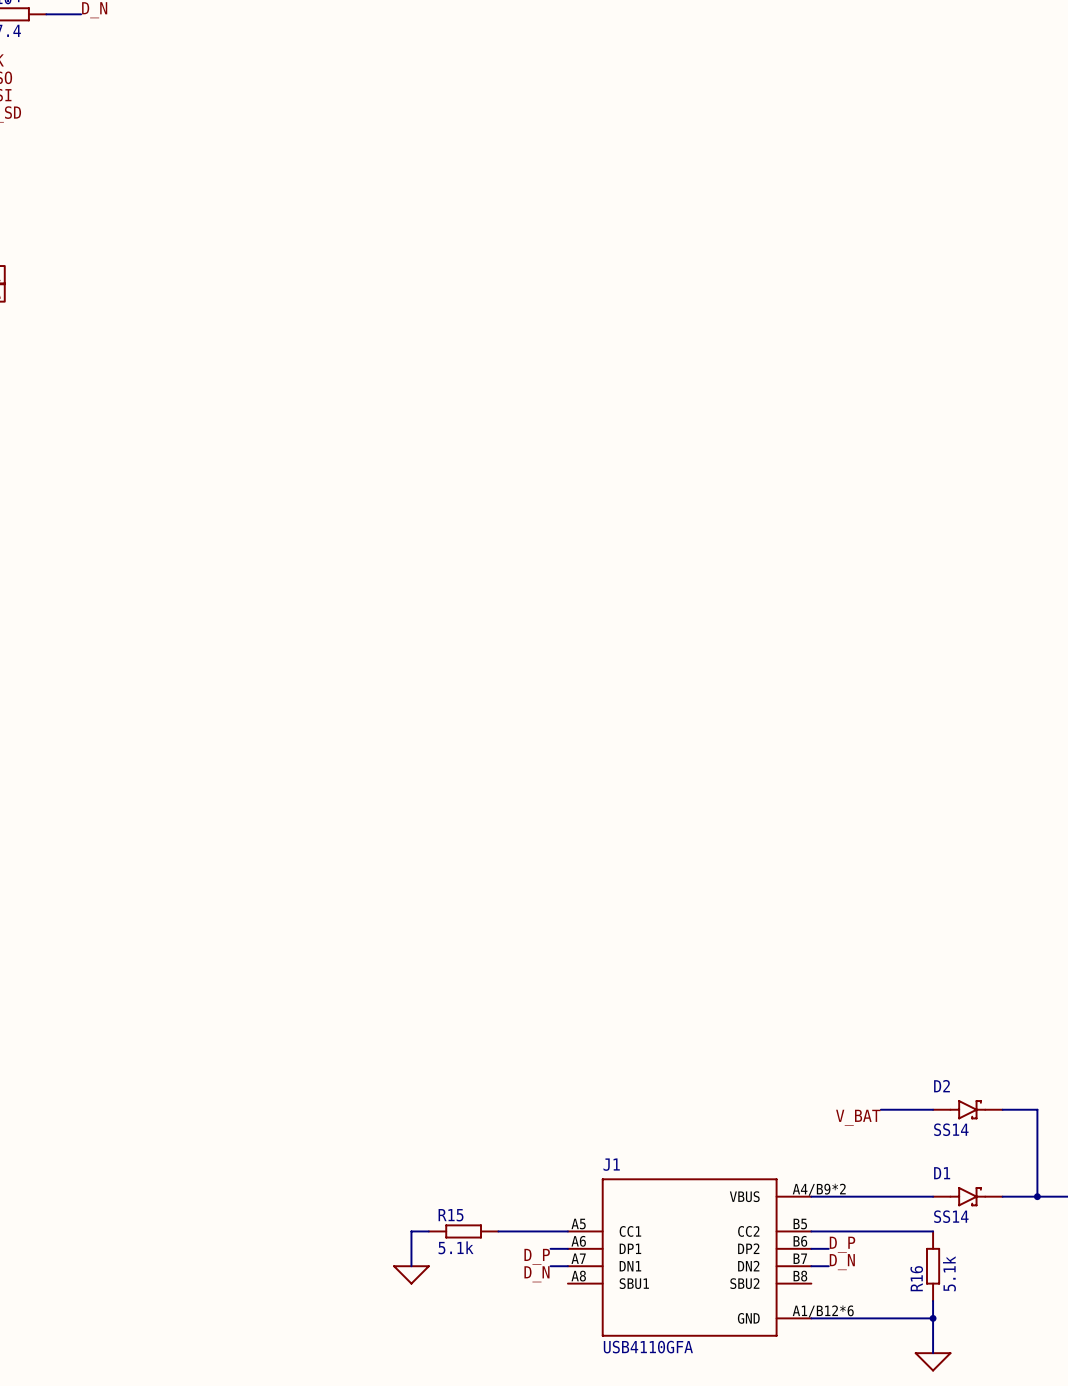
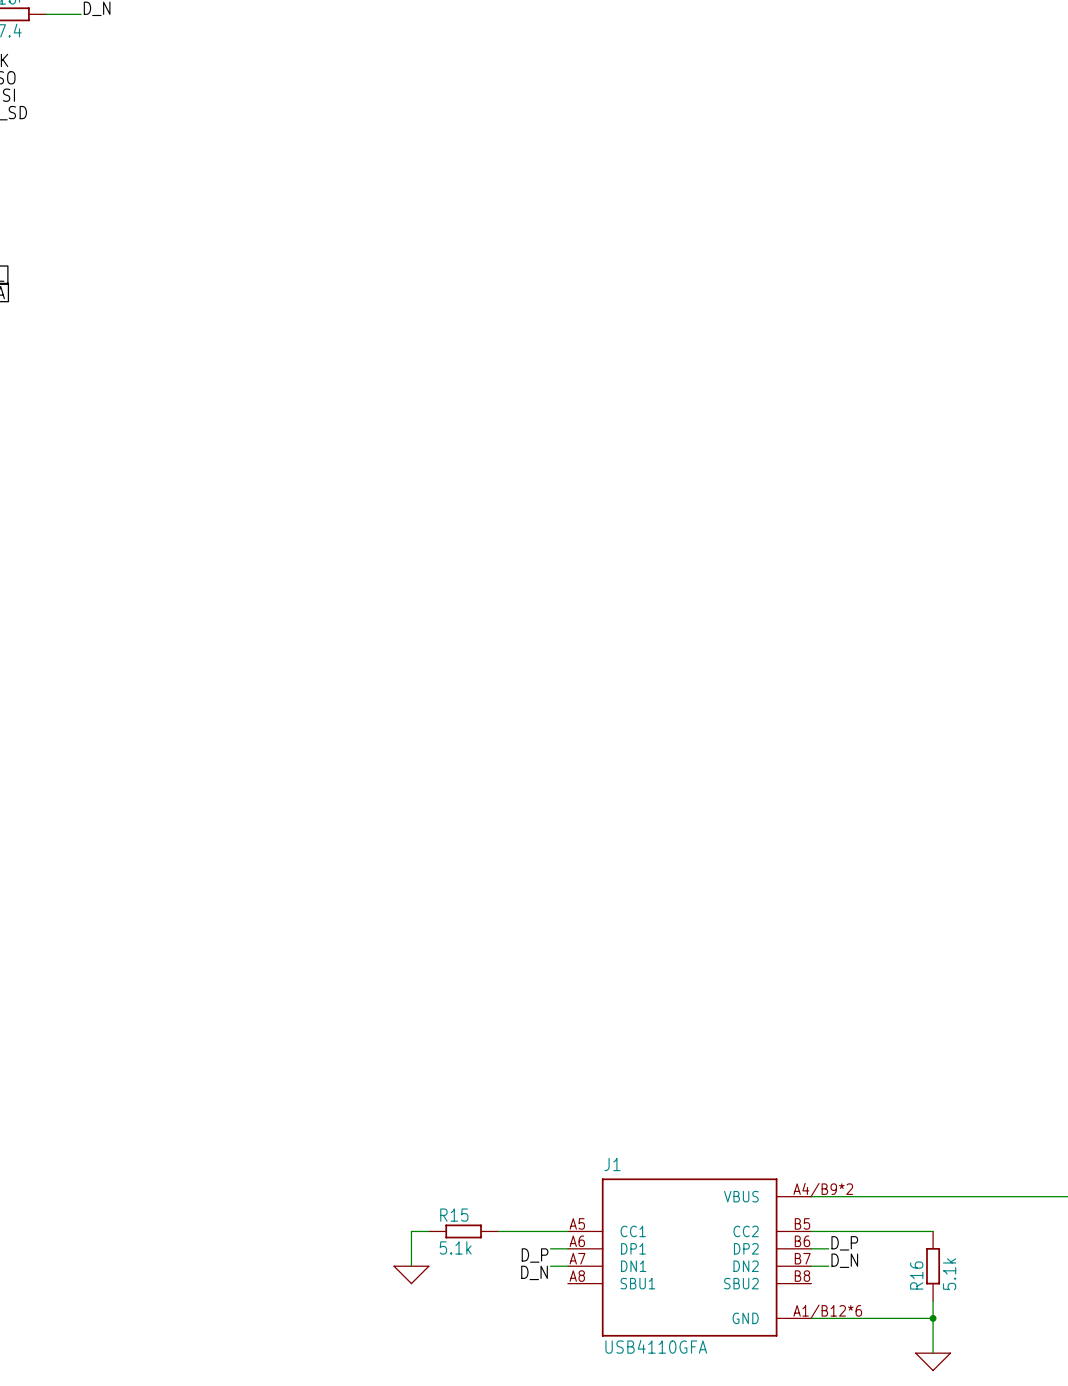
wire: (880, 1109) (933, 1109) -> none
D2: SS14 (967, 1109) -> none
wire: (1002, 1109) (1037, 1109) (1037, 1196) -> none
label: V_BAT (858, 1117) -> none
D1: SS14 (967, 1196) -> none
junction: (1037, 1196) -> none

